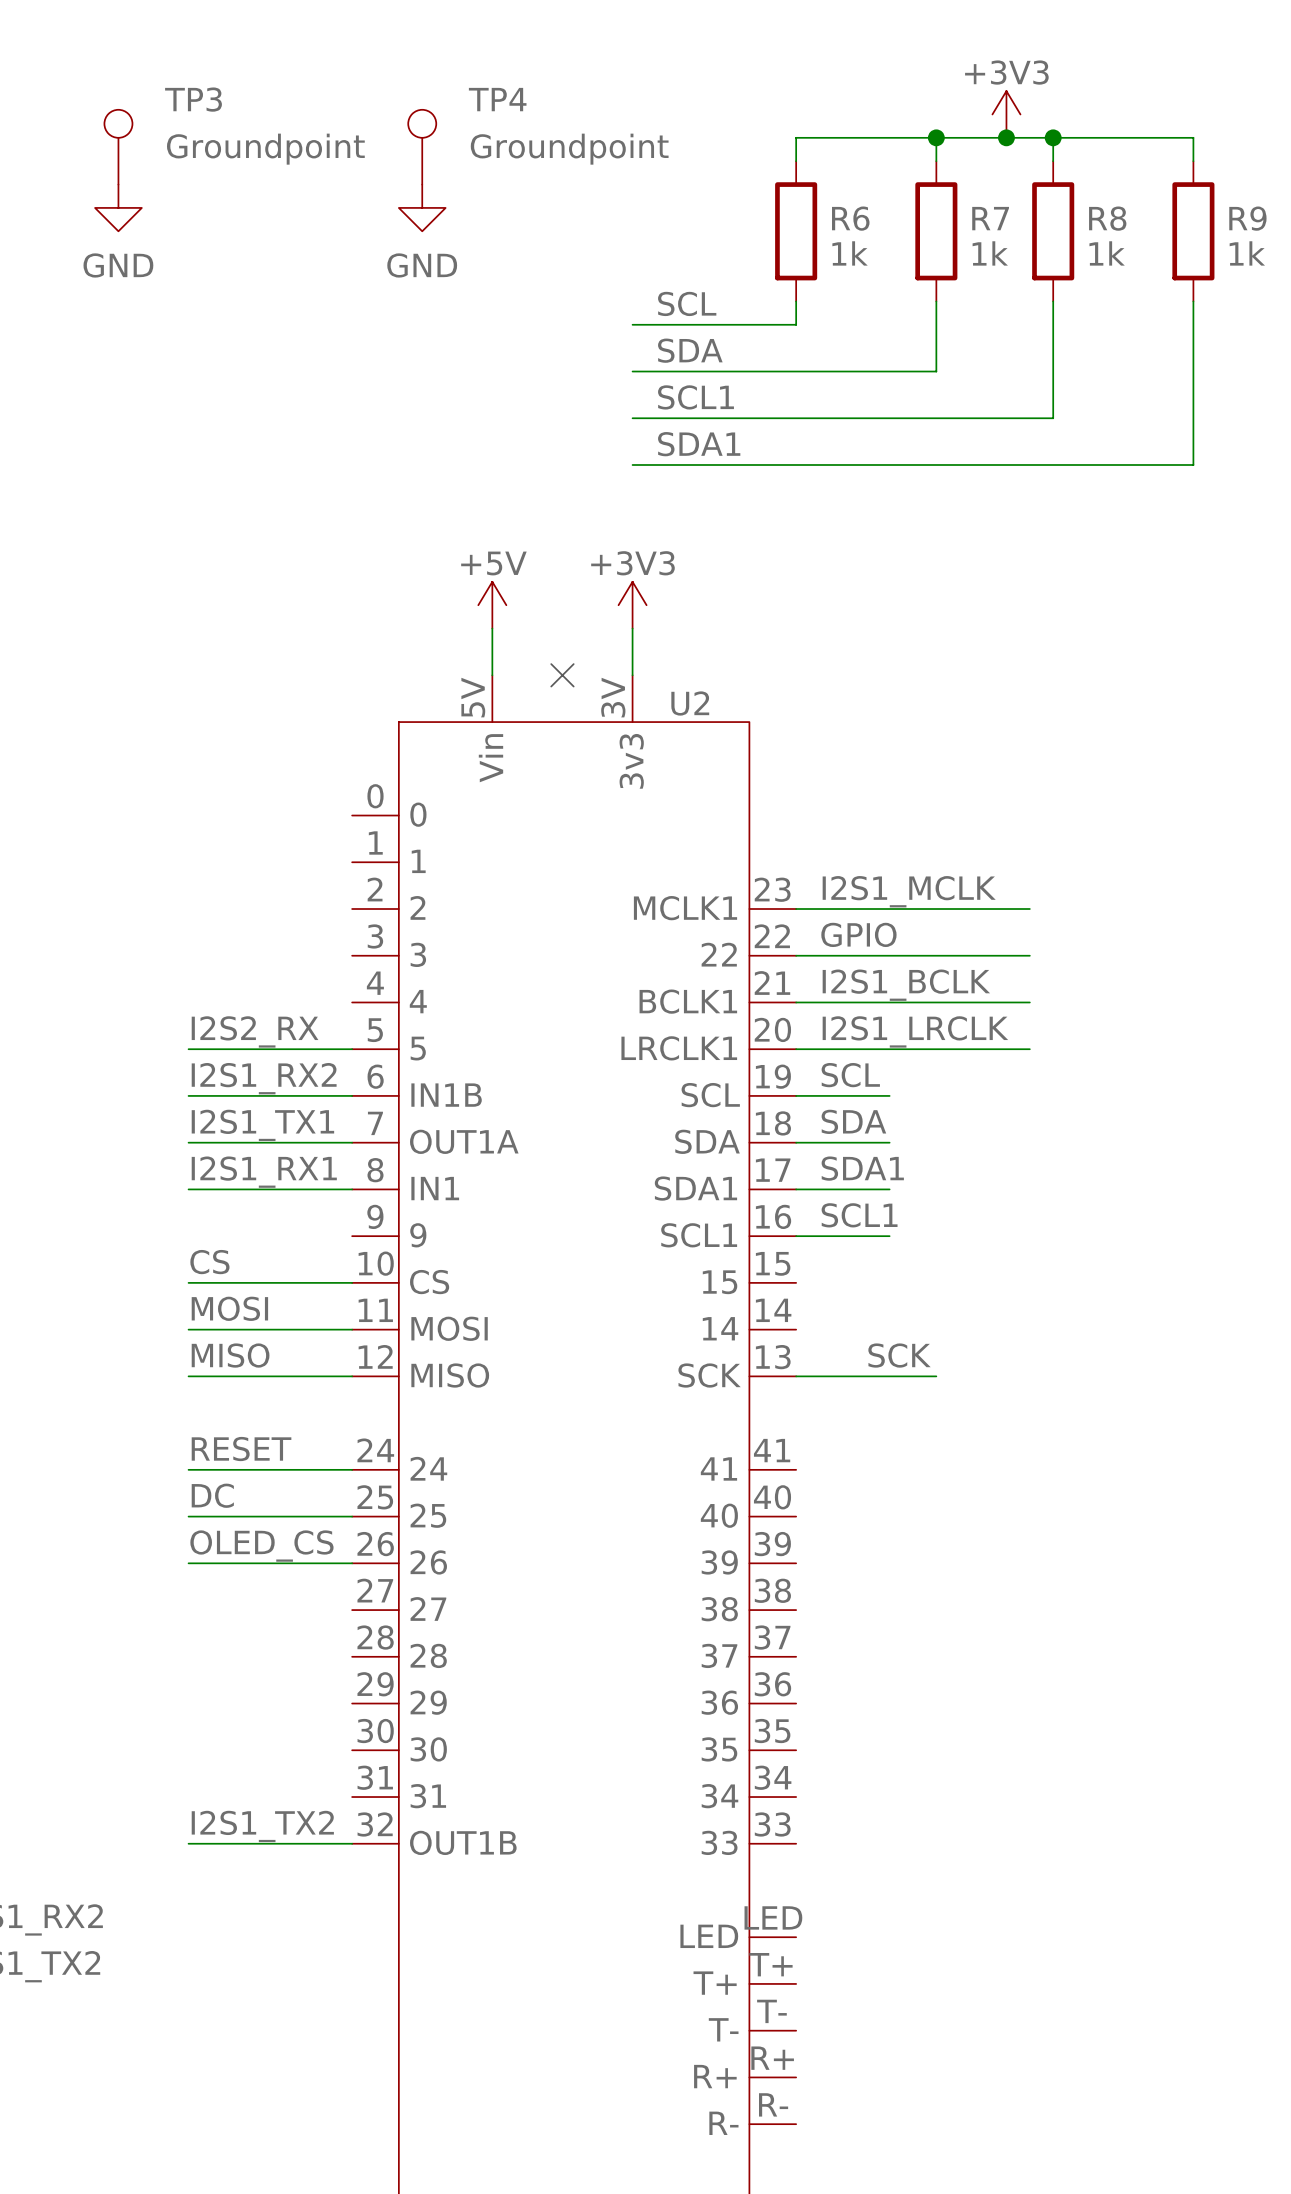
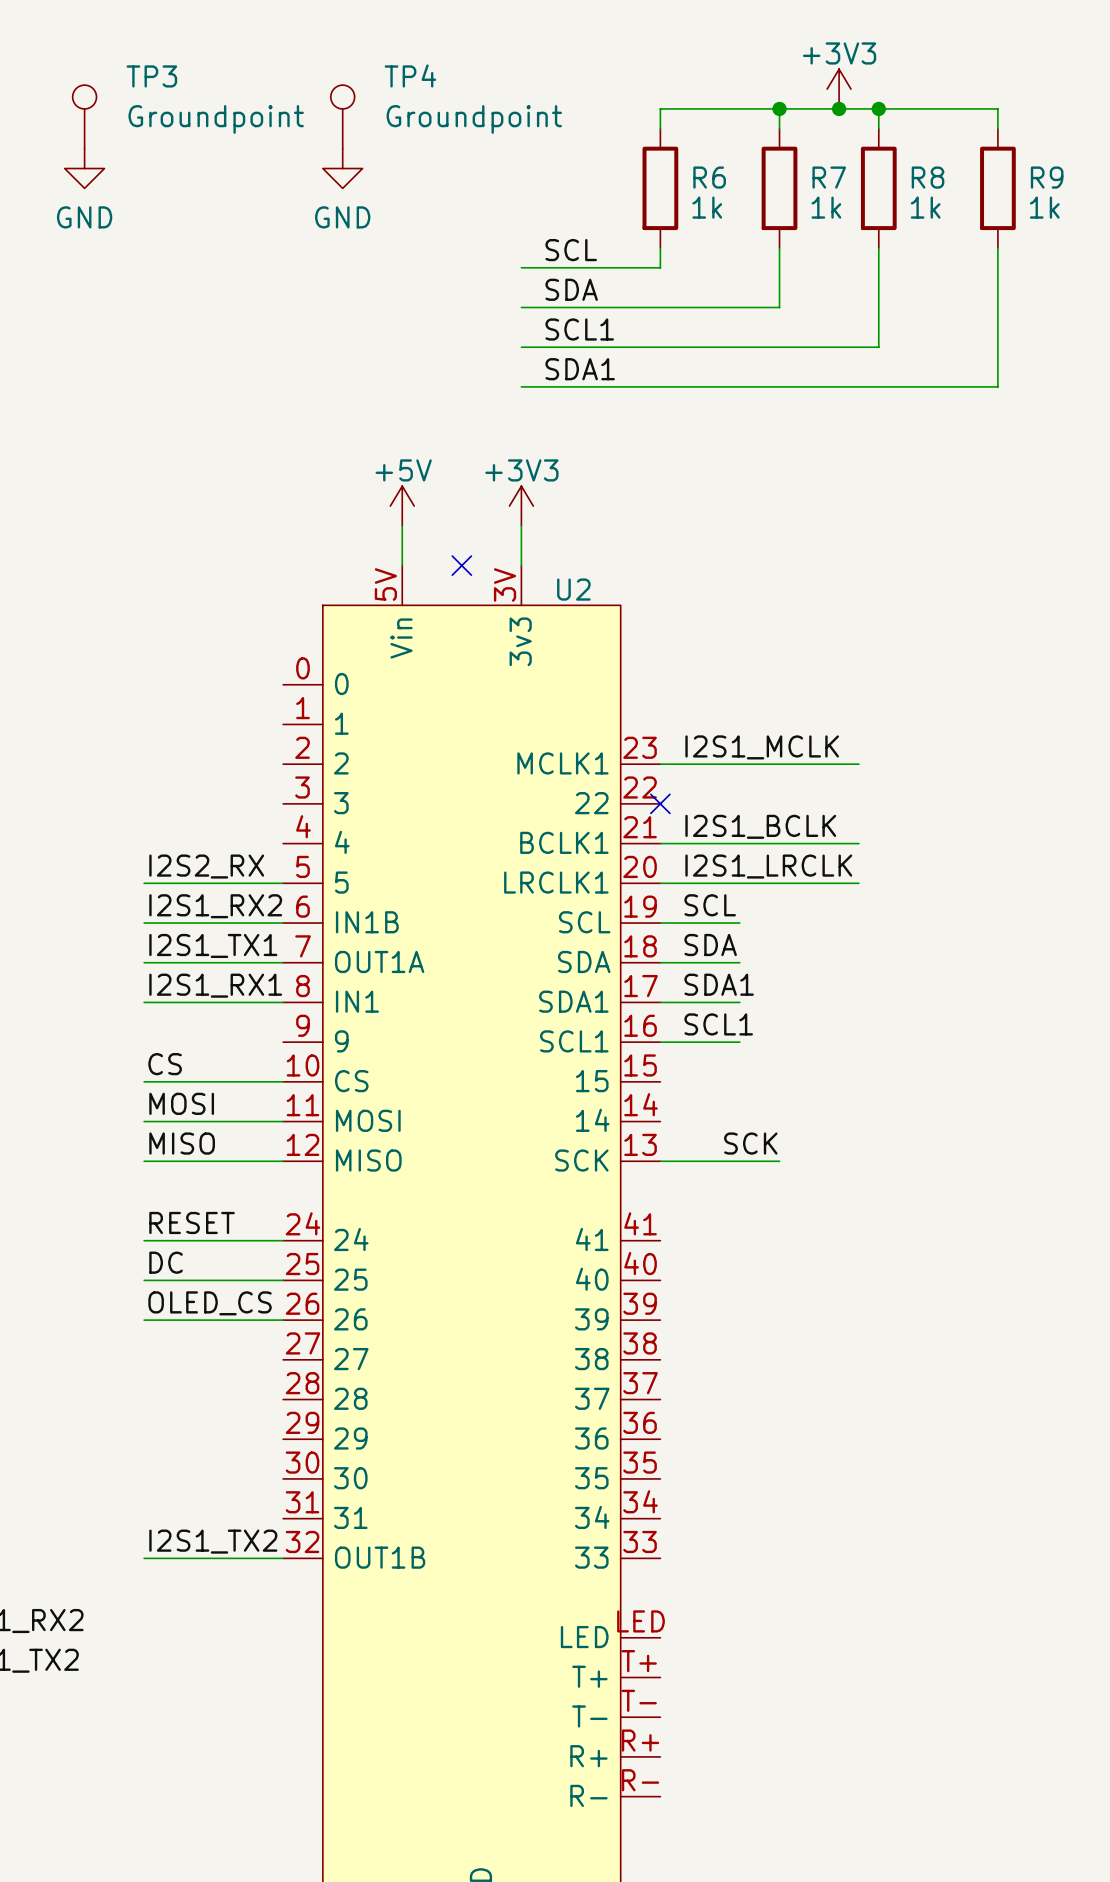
label: GPIO (858, 934) -> none
wire: (796, 955) (1029, 955) -> none
no-connect mark: none -> (660, 803)

